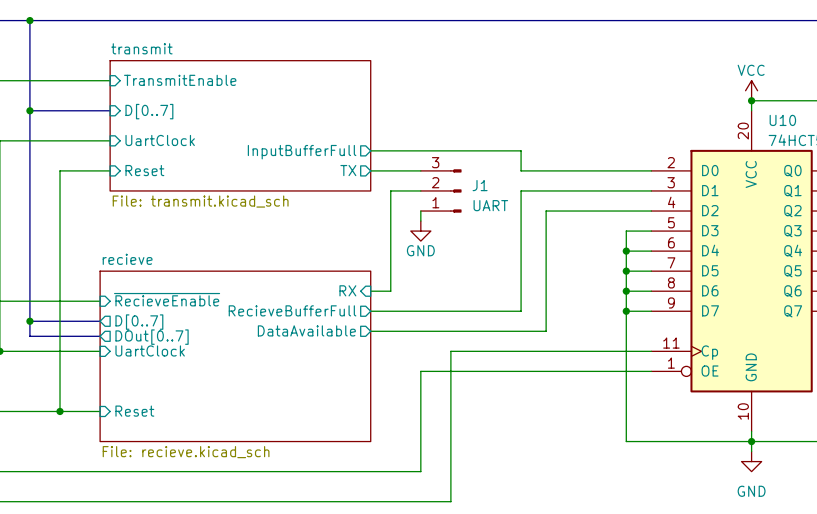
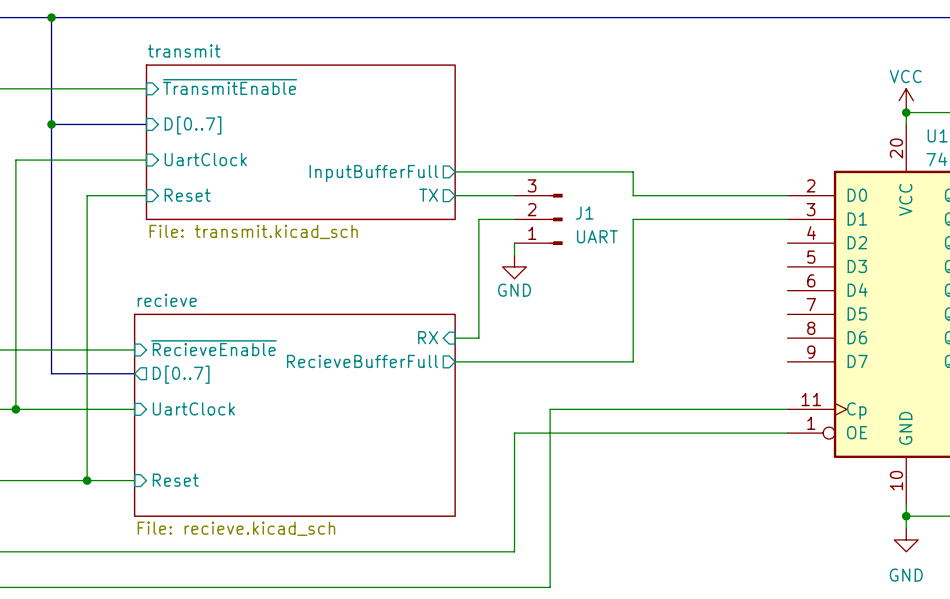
sheet pin: TransmitEnable (180, 80) -> ~{TransmitEnable} (230, 87)
wire: (651, 211) (546, 211) (546, 331) (370, 331) -> none
wire: (651, 231) (626, 231) (626, 441) (751, 441) -> none
wire: (626, 251) (651, 251) -> none
junction: (626, 251) -> none
wire: (626, 271) (651, 271) -> none
junction: (626, 271) -> none
wire: (626, 291) (651, 291) -> none
junction: (626, 291) -> none
wire: (626, 311) (651, 311) -> none
junction: (626, 311) -> none
bus: (29, 321) (29, 336) (100, 336) -> none
junction: (29, 321) -> none
sheet pin: DataAvailable (306, 330) -> none
sheet pin: DOut[0..7] (152, 337) -> none

